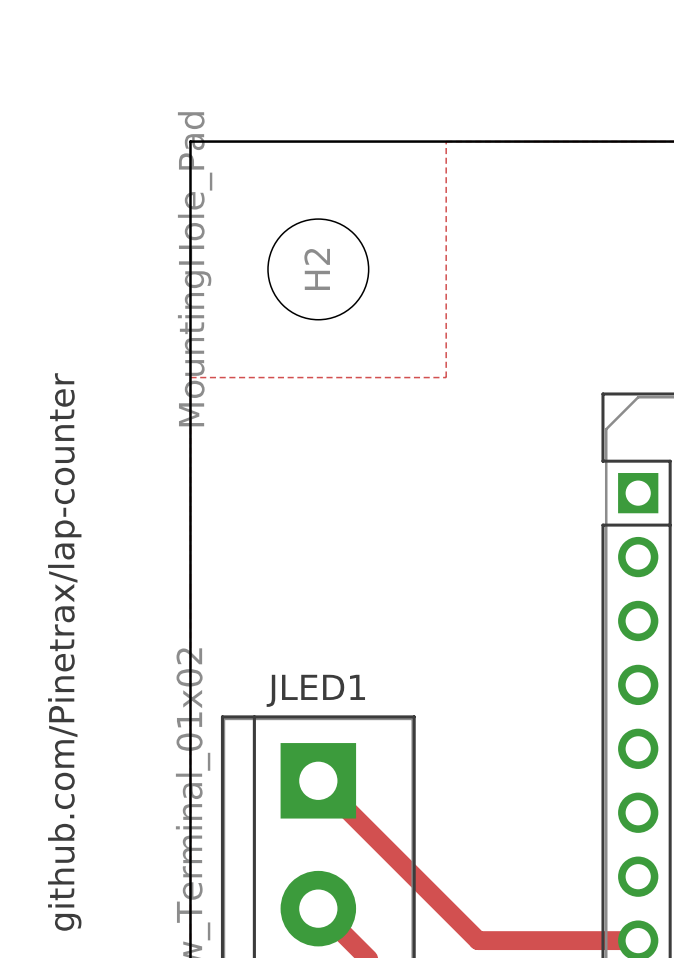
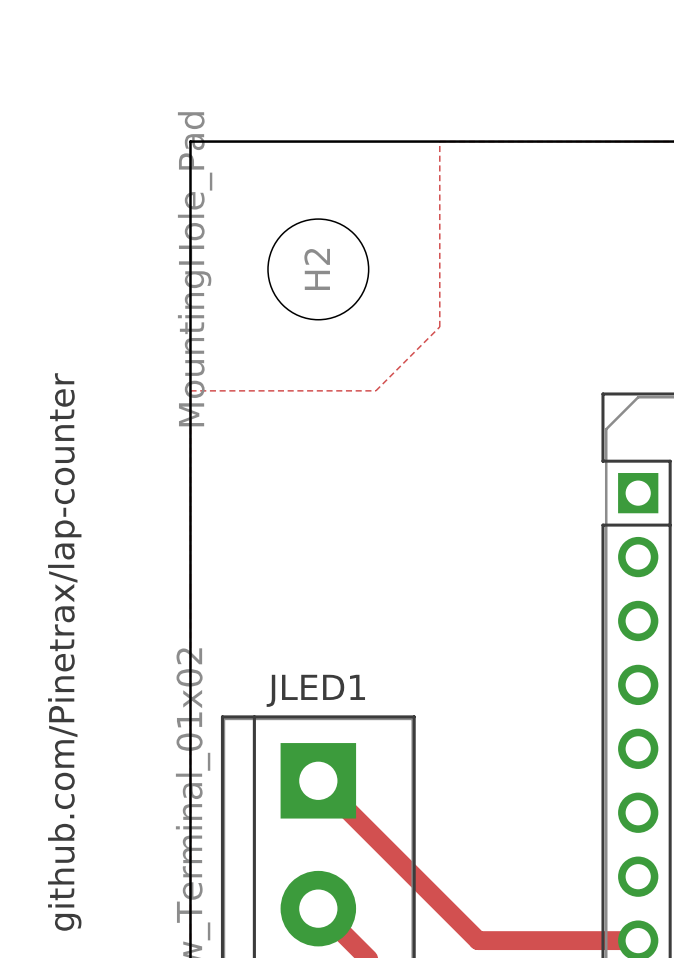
zone outline: (446, 141) (446, 377) (190, 377) (190, 390) -> (446, 141) (439, 141) (439, 326) (375, 390) (190, 390)

